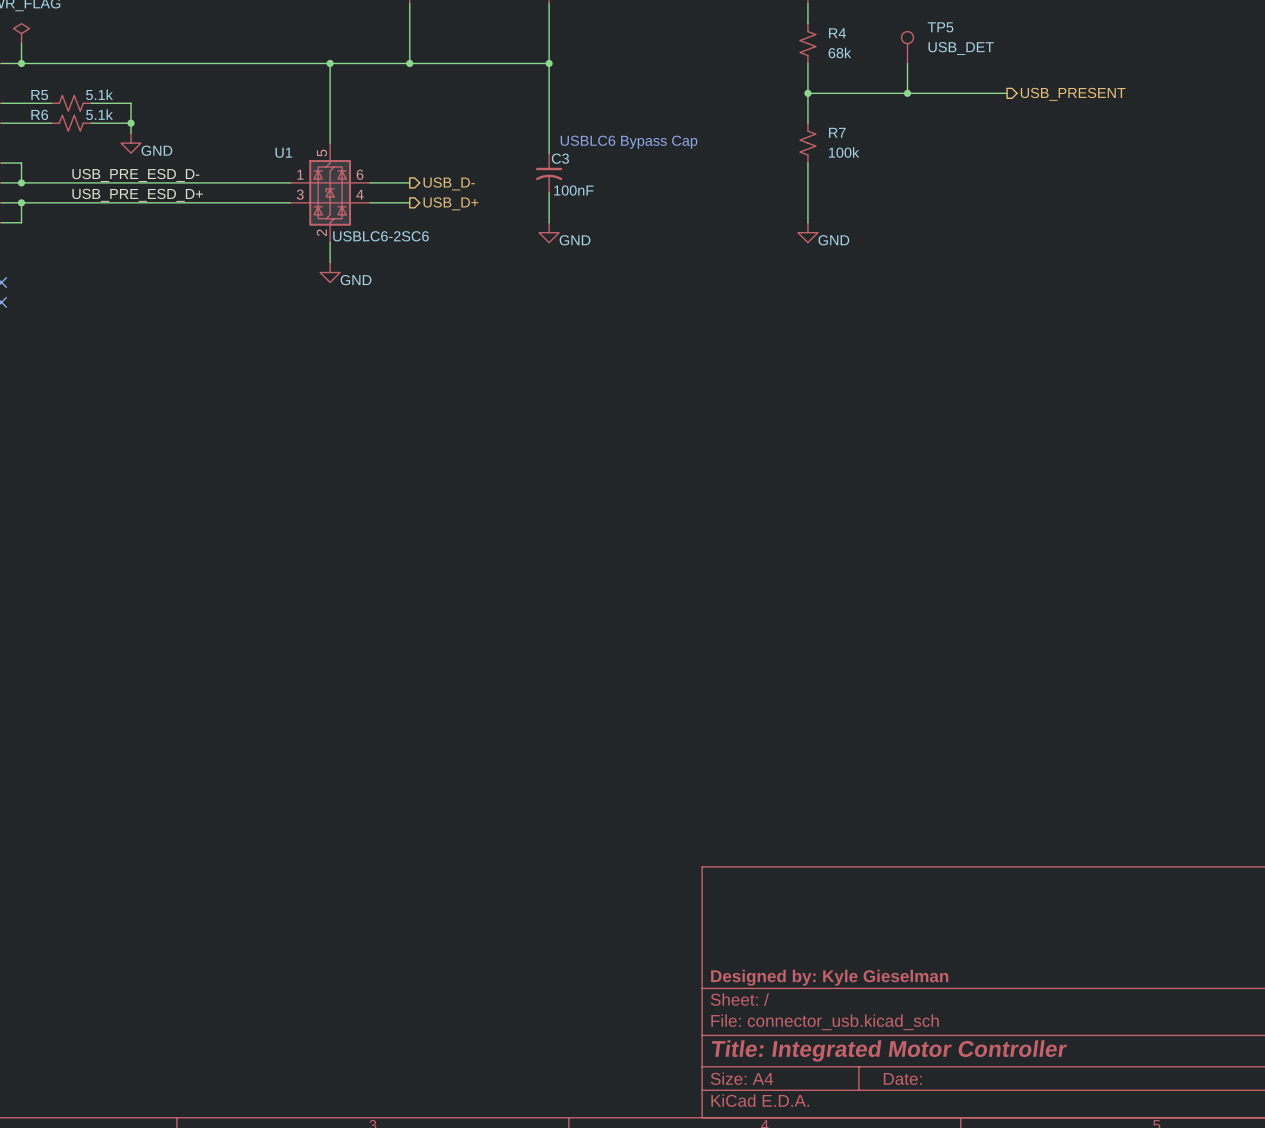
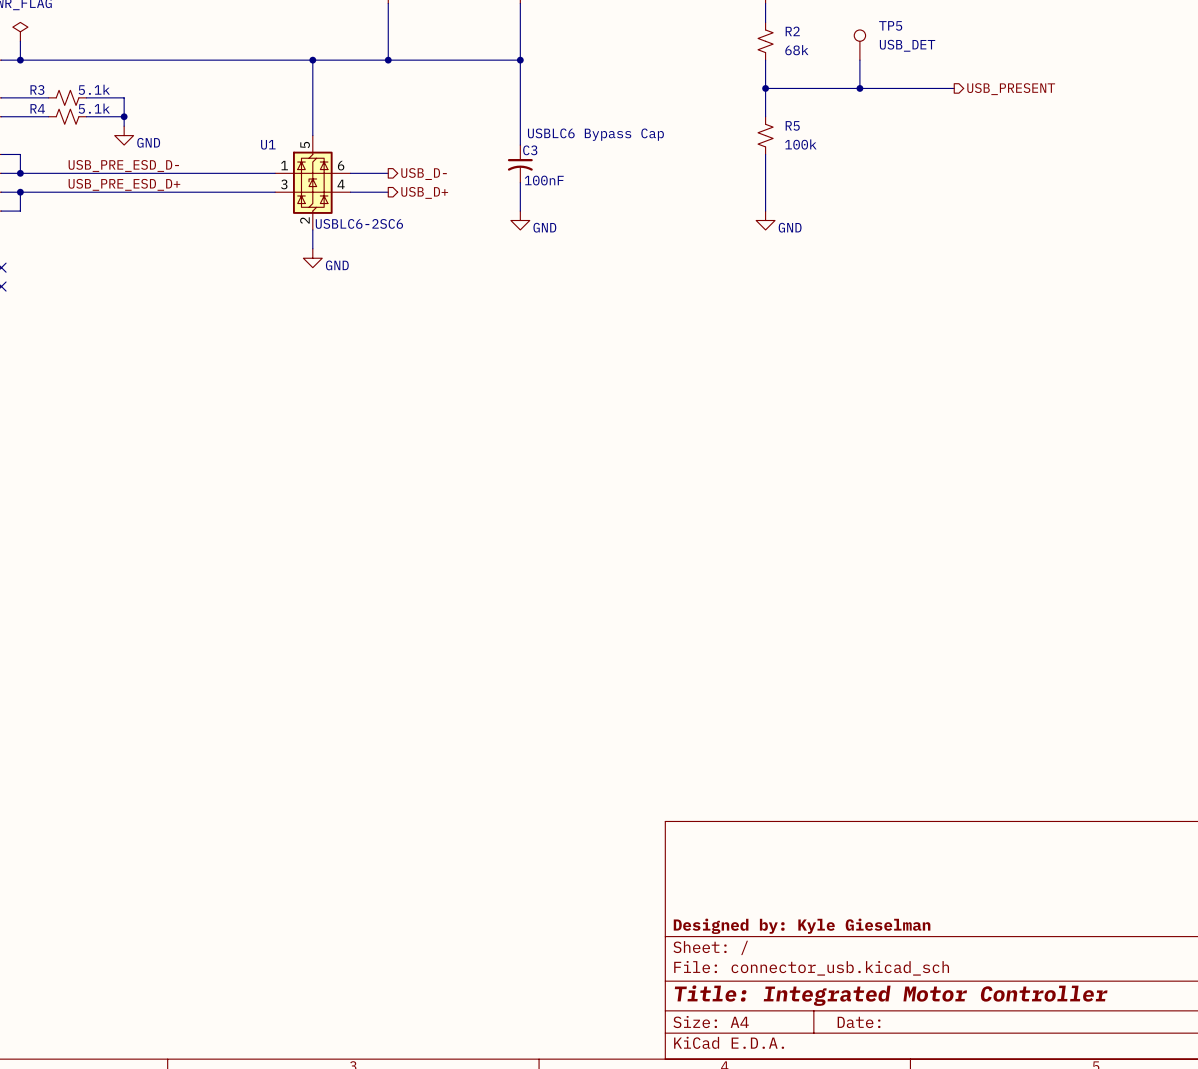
R4 name: R4 (837, 33) -> R2 (792, 31)
R5 name: R5 (39, 95) -> R3 (37, 89)
R6 name: R6 (39, 114) -> R4 (37, 108)
R7 name: R7 (837, 132) -> R5 (792, 125)

